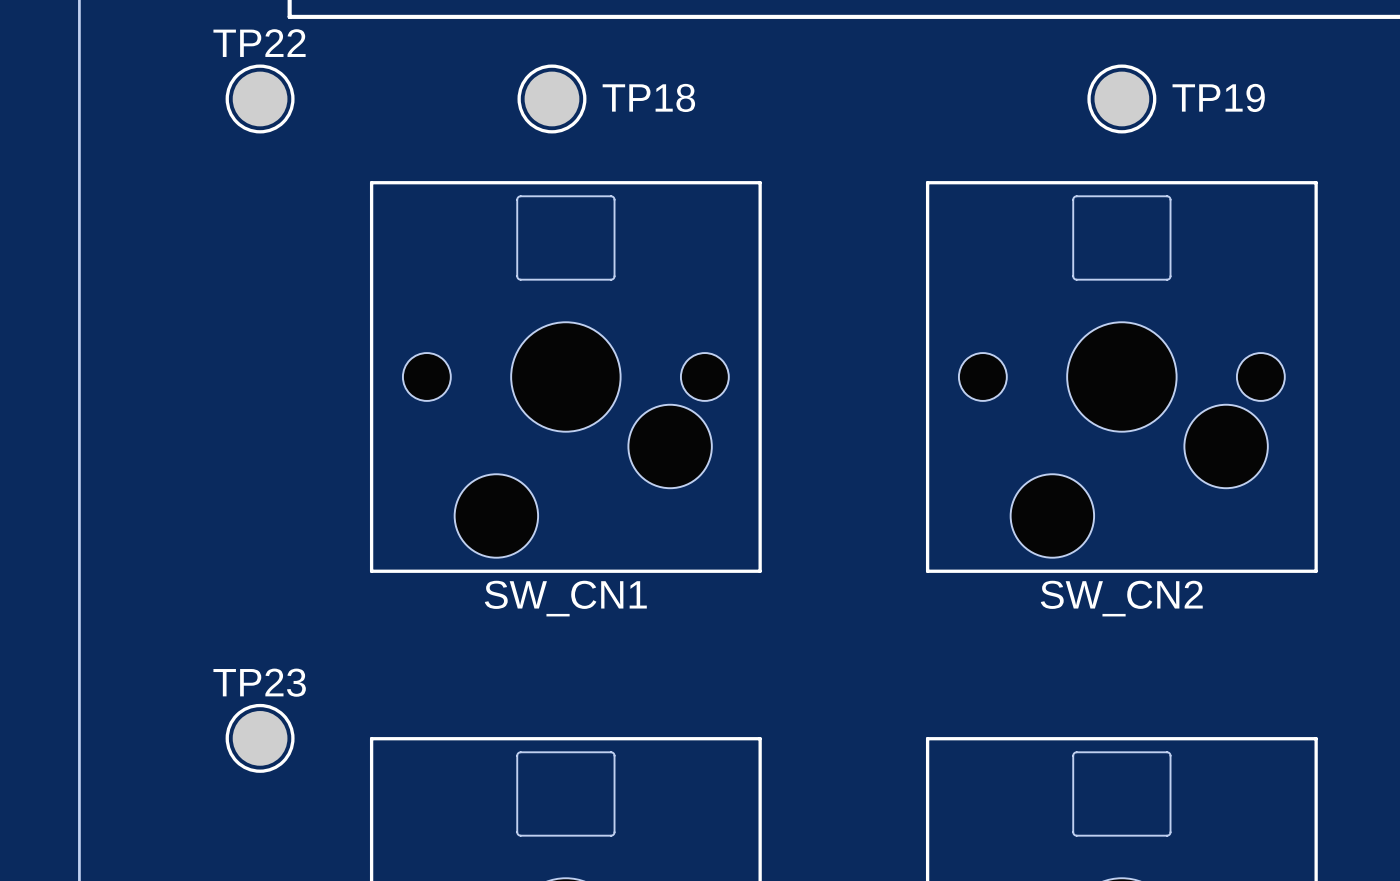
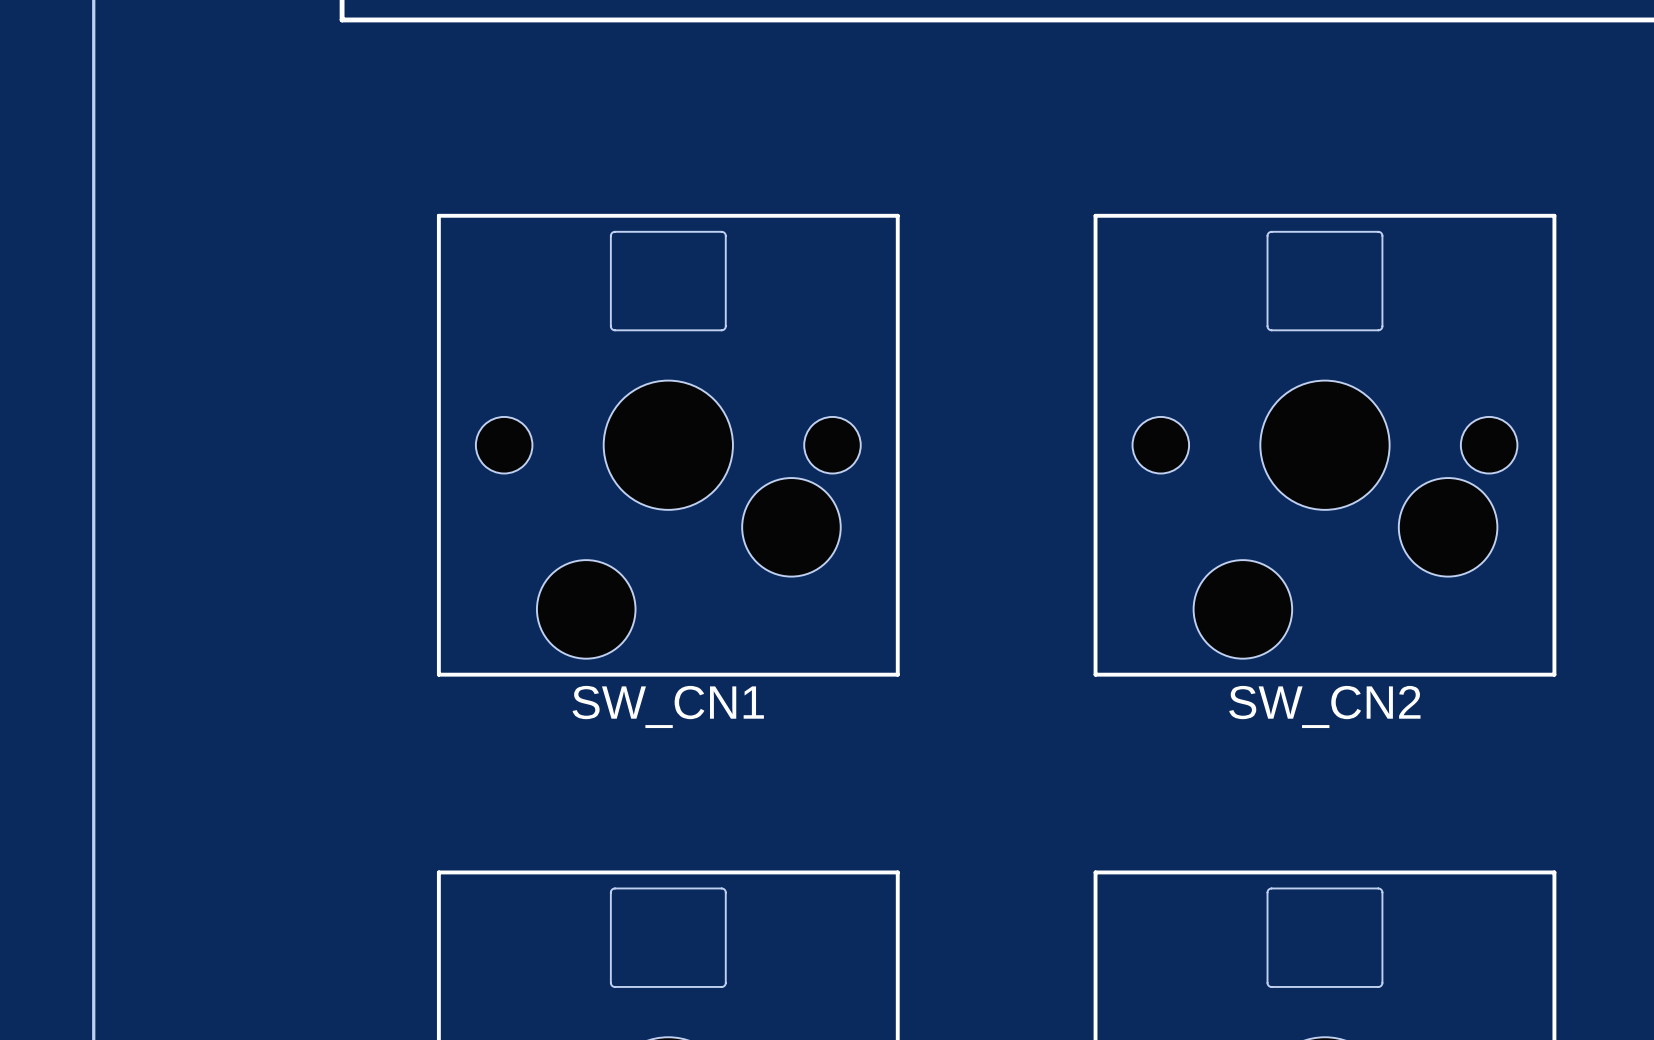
TP22: (260, 98) -> none
TP18: (551, 98) -> none
TP19: (1121, 98) -> none
TP23: (260, 738) -> none

